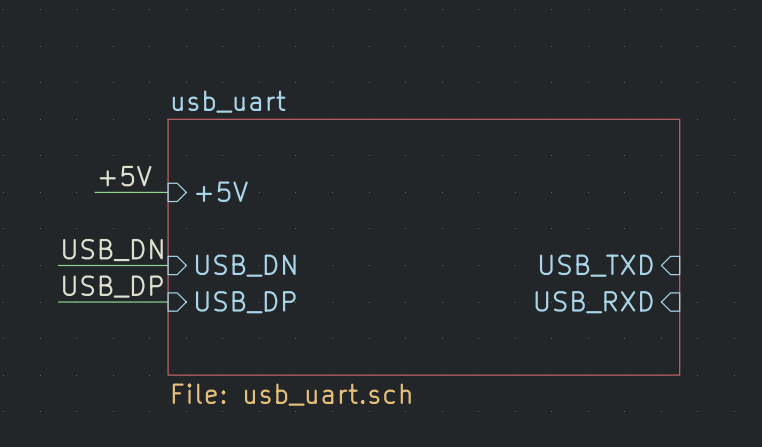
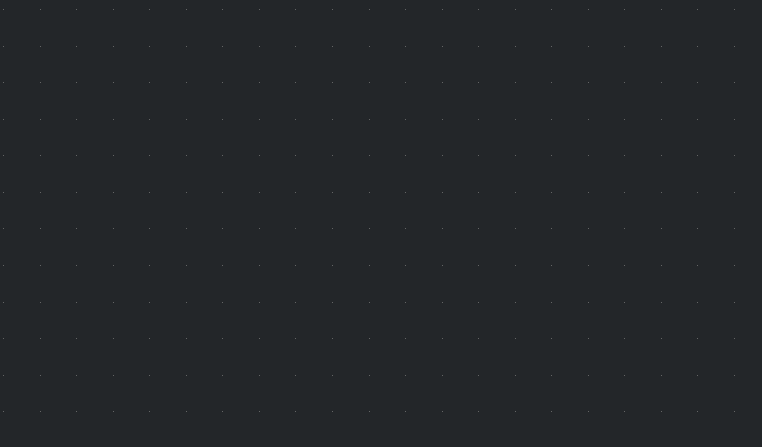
label: +5V (125, 176) -> none
sheet pin: +5V (221, 191) -> none
wire: (94, 192) (168, 192) -> none
sheet usb_uart: File: usb_uart.sch (423, 247) -> none
label: USB_DN (112, 250) -> none
wire: (58, 265) (168, 265) -> none
sheet pin: USB_DN (245, 265) -> none
sheet pin: USB_TXD (596, 265) -> none
label: USB_DP (112, 286) -> none
wire: (58, 302) (168, 302) -> none
sheet pin: USB_DP (245, 302) -> none
sheet pin: USB_RXD (594, 302) -> none

